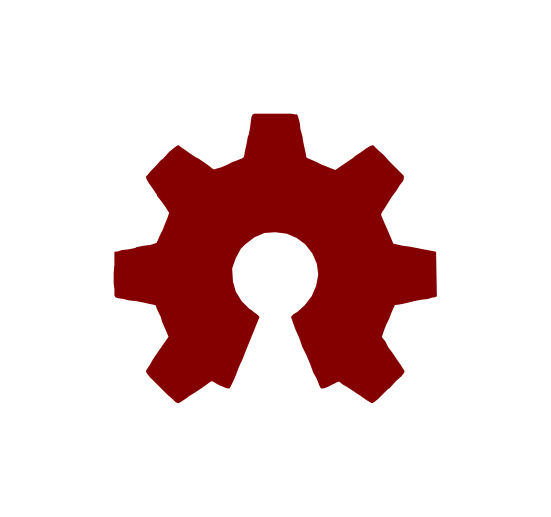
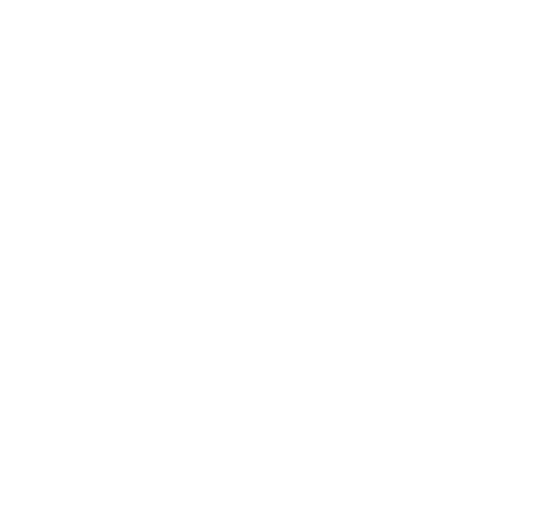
power symbol: (275, 258) -> none

